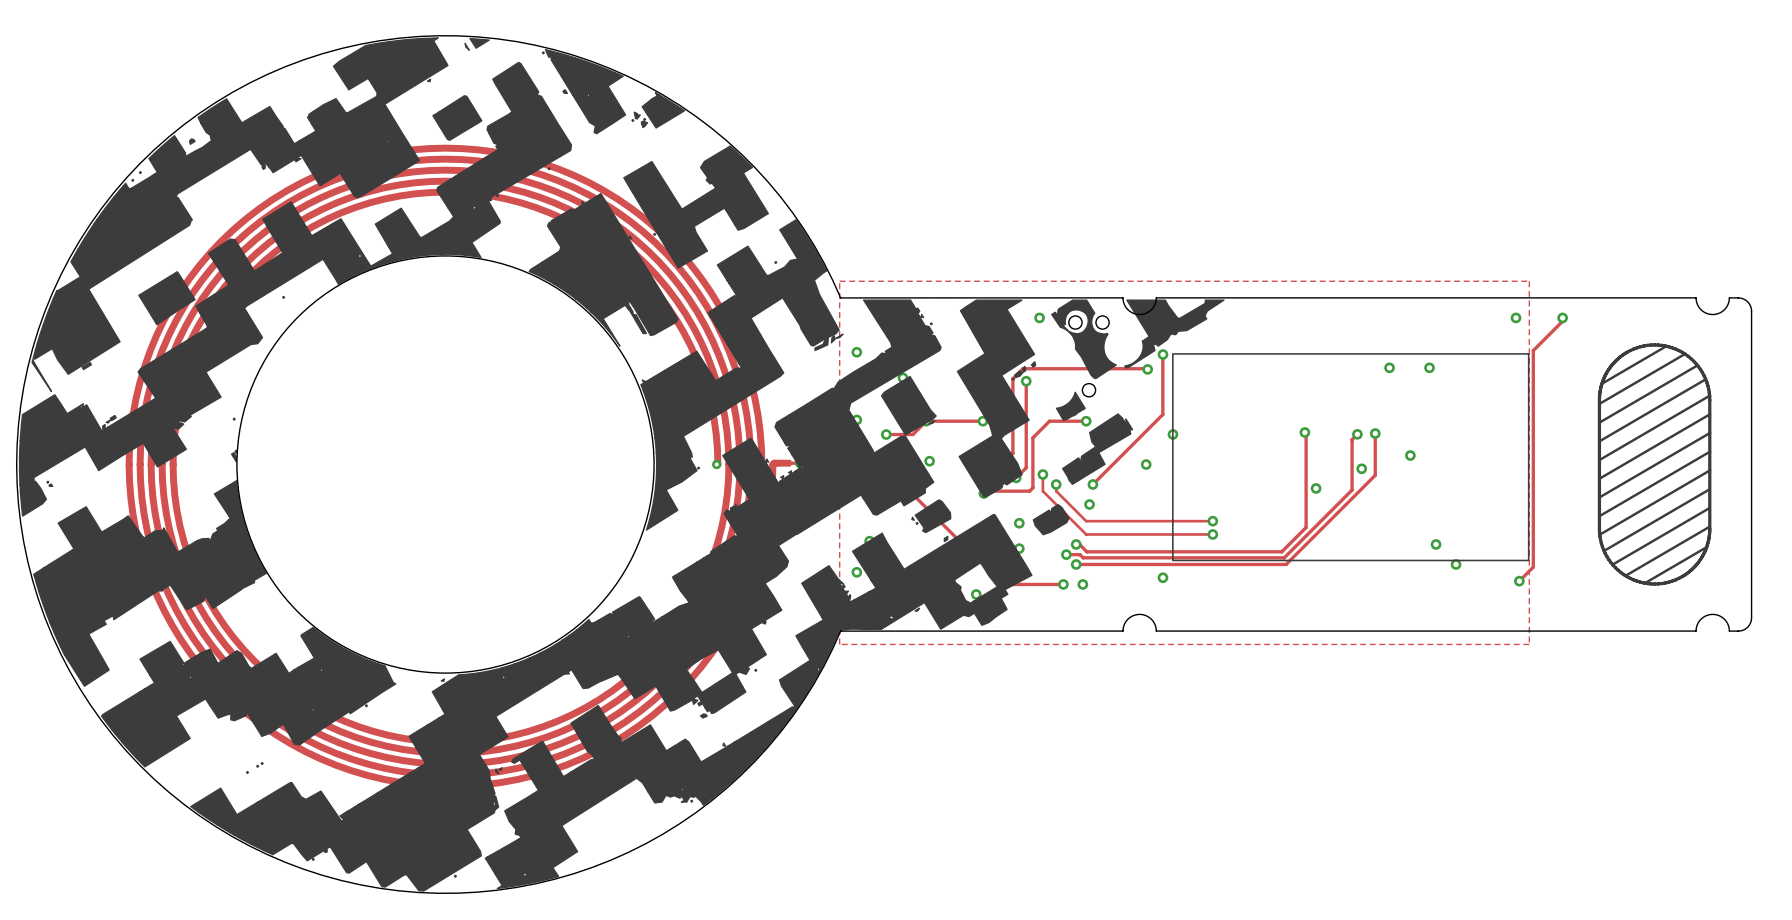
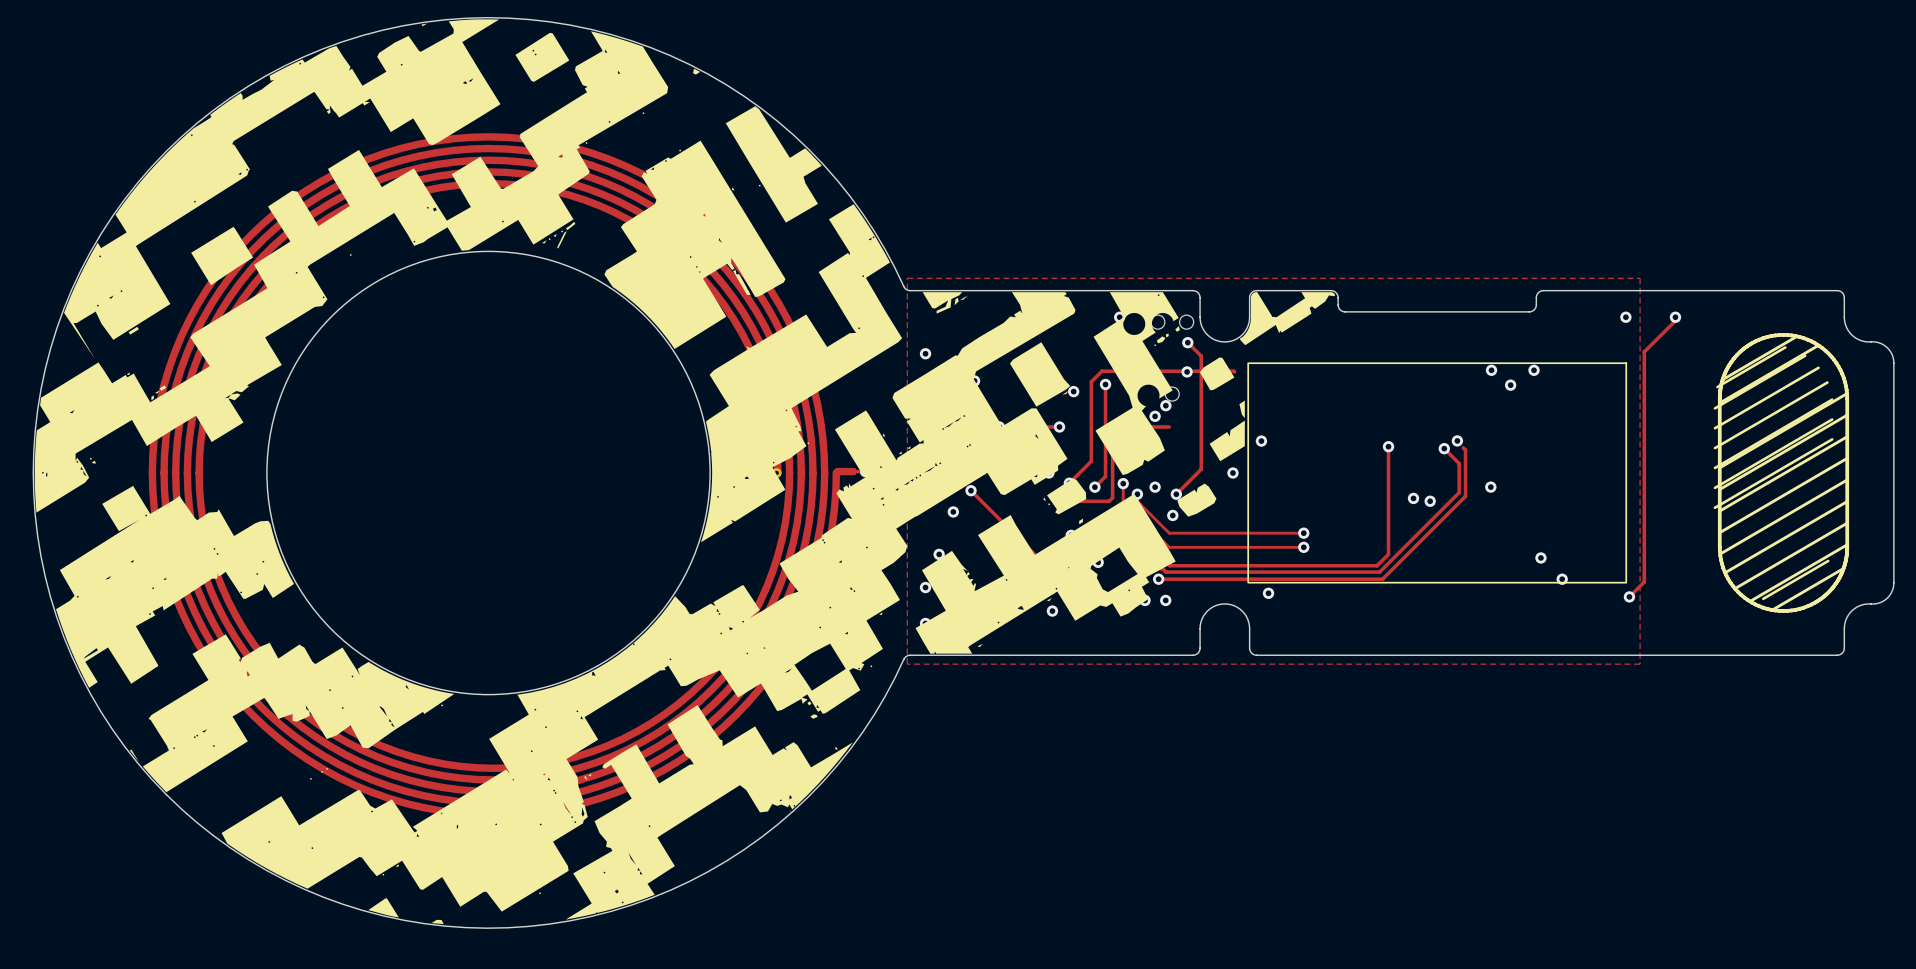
drawing: [18, 37, 952, 892] -> none
drawing: none -> [34, 19, 1217, 925]
drawing: none -> [693, 68, 701, 75]
drawing shape: [705, 177, 712, 185] -> [725, 106, 822, 223]
drawing shape: [640, 219, 840, 531] -> [701, 204, 903, 543]
drawing: none -> [1199, 292, 1336, 462]
board edge: (840, 297) (823, 262) (803, 228) (780, 197) (754, 167) (726, 140) (695, 116) (645, 85) (592, 61) (554, 49) (516, 41) (477, 36) (438, 35) (399, 38) (360, 44) (303, 59) (267, 74) (232, 92) (199, 113) (168, 137) (139, 163) (113, 192) (90, 224) (69, 257) (52, 293) (38, 329) (23, 386) (18, 425) (16, 464) (18, 503) (23, 542) (38, 599) (52, 636) (69, 671) (90, 704) (113, 736) (139, 765) (168, 791) (199, 815) (232, 836) (267, 854) (303, 869) (360, 884) (399, 890) (438, 893) (477, 892) (516, 887) (554, 879) (592, 867) (645, 843) (695, 812) (726, 788) (754, 761) (780, 731) (803, 700) (823, 666) (840, 631) -> none
board edge: (840, 297) (1122, 297) (1127, 309) (1139, 314) (1151, 309) (1156, 297) (1696, 297) (1701, 310) (1712, 314) (1723, 310) (1729, 297) (1738, 297) (1747, 301) (1751, 311) (1751, 617) (1749, 624) (1742, 630) (1729, 631) (1724, 619) (1712, 614) (1700, 619) (1696, 631) (1156, 631) (1151, 619) (1139, 614) (1127, 619) (1122, 631) (840, 631) -> none
drawing shape: [956, 299, 1036, 498] -> [1062, 390, 1069, 395]
drawing: [1011, 299, 1225, 486] -> none
board edge: none -> (1844, 317) (1845, 325) (1852, 335) (1862, 341) (1883, 344) (1890, 351) (1893, 358) (1893, 582) (1891, 592) (1885, 599) (1878, 603) (1859, 605) (1848, 614) (1844, 625) (1844, 650) (1839, 654) (1255, 655) (1249, 650) (1249, 625) (1246, 616) (1237, 607) (1224, 603) (1212, 607) (1203, 616) (1200, 625) (1199, 650) (1193, 655) (908, 655) (904, 658) (874, 714) (837, 765) (808, 796) (761, 837) (708, 871) (651, 898) (590, 916) (528, 926) (486, 928) (444, 926) (403, 920) (342, 904) (303, 888) (266, 870) (230, 847) (196, 822) (166, 794) (137, 763) (101, 712) (80, 675) (63, 637) (50, 597) (40, 556) (35, 514) (33, 472) (37, 410) (45, 368) (56, 328) (71, 289) (90, 251) (112, 216) (137, 182) (166, 151) (213, 110) (247, 86) (284, 65) (322, 48) (362, 35) (403, 25) (444, 19) (486, 17) (528, 19) (590, 29) (651, 47) (689, 64) (726, 84) (777, 121) (823, 164) (862, 213) (884, 249) (904, 287) (908, 290) (1193, 290) (1199, 296) (1200, 320) (1203, 329) (1212, 338) (1224, 341) (1237, 338) (1246, 329) (1249, 320) (1249, 296) (1252, 292) (1256, 290) (1332, 290) (1337, 295) (1339, 308) (1345, 311) (1530, 311) (1535, 307) (1537, 293) (1543, 290) (1837, 290) (1841, 292) (1844, 296) (1844, 317)
line: none -> (1796, 336) (1722, 379)
via: none -> (1187, 342)
line: none -> (1818, 345) (1720, 402)
line: (1651, 345) (1633, 349) (1619, 357) (1608, 369) (1601, 385) (1599, 400) (1599, 528) (1603, 550) (1615, 567) (1633, 579) (1654, 584) (1672, 581) (1686, 573) (1699, 560) (1707, 544) (1709, 528) (1709, 400) (1705, 378) (1691, 358) (1672, 347) (1651, 345) -> (1783, 334) (1759, 339) (1738, 353) (1724, 374) (1719, 398) (1719, 547) (1721, 563) (1730, 582) (1744, 597) (1763, 607) (1783, 611) (1807, 606) (1828, 592) (1842, 571) (1847, 547) (1847, 398) (1845, 381) (1836, 363) (1822, 348) (1803, 338) (1783, 334)
track: (1162, 354) (1162, 414) (1116, 461) -> (1187, 342) (1201, 356) (1201, 469)
via: (1162, 354) -> none
via: none -> (1187, 371)
via: (1147, 369) -> none
via: none -> (1510, 385)
line: none -> (1847, 393) (1720, 467)
line: none -> (1847, 414) (1720, 489)
via position: (1086, 421) -> (1165, 405)
line: none -> (1847, 436) (1720, 510)
track: (1304, 432) (1306, 527) (1292, 541) -> (1388, 446) (1388, 554)
via position: (1304, 432) -> (1388, 446)
track: (1375, 433) (1375, 475) (1286, 564) -> (1463, 447) (1465, 450) (1465, 496) (1381, 579)
via: (1375, 433) -> none
track: (1357, 434) (1352, 439) (1352, 490) -> (1444, 448) (1459, 463) (1459, 492) (1451, 500)
via: none -> (1444, 448)
line: none -> (1847, 458) (1720, 532)
line: (1710, 451) (1599, 515) -> none
via: (1410, 455) -> none
part position: (1350, 457) -> (1437, 472)
via: (1361, 468) -> none
line: (1710, 470) (1599, 534) -> none
line: none -> (1847, 479) (1720, 554)
via: none -> (1490, 487)
drawing shape: [33, 480, 267, 687] -> [56, 485, 295, 688]
line: (1709, 489) (1604, 550) -> (1847, 523) (1735, 588)
via: none -> (1430, 501)
line: none -> (1847, 501) (1725, 572)
drawing: [1032, 503, 1070, 536] -> none
line: (1709, 507) (1612, 564) -> none
drawing shape: [484, 513, 1033, 890] -> [810, 714, 818, 719]
line: (1709, 526) (1625, 575) -> none
line: none -> (1847, 544) (1750, 601)
line: none -> (1843, 568) (1772, 609)
via position: (1162, 577) -> (1268, 593)

